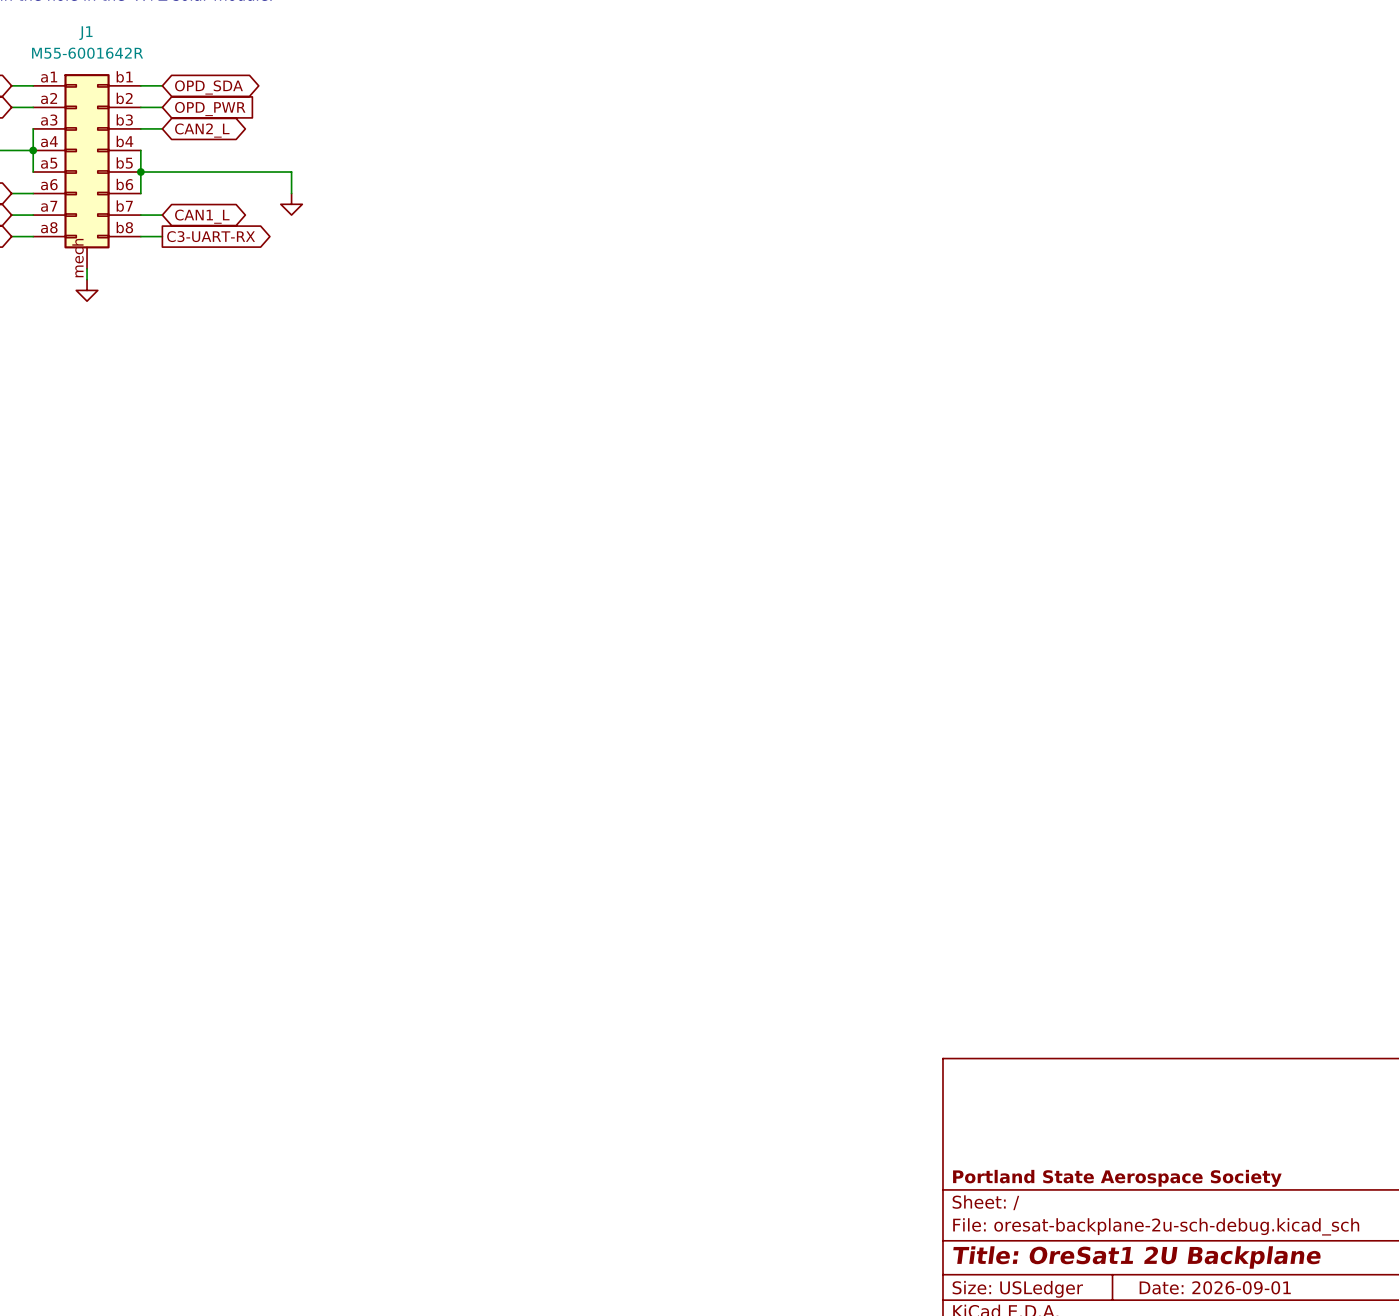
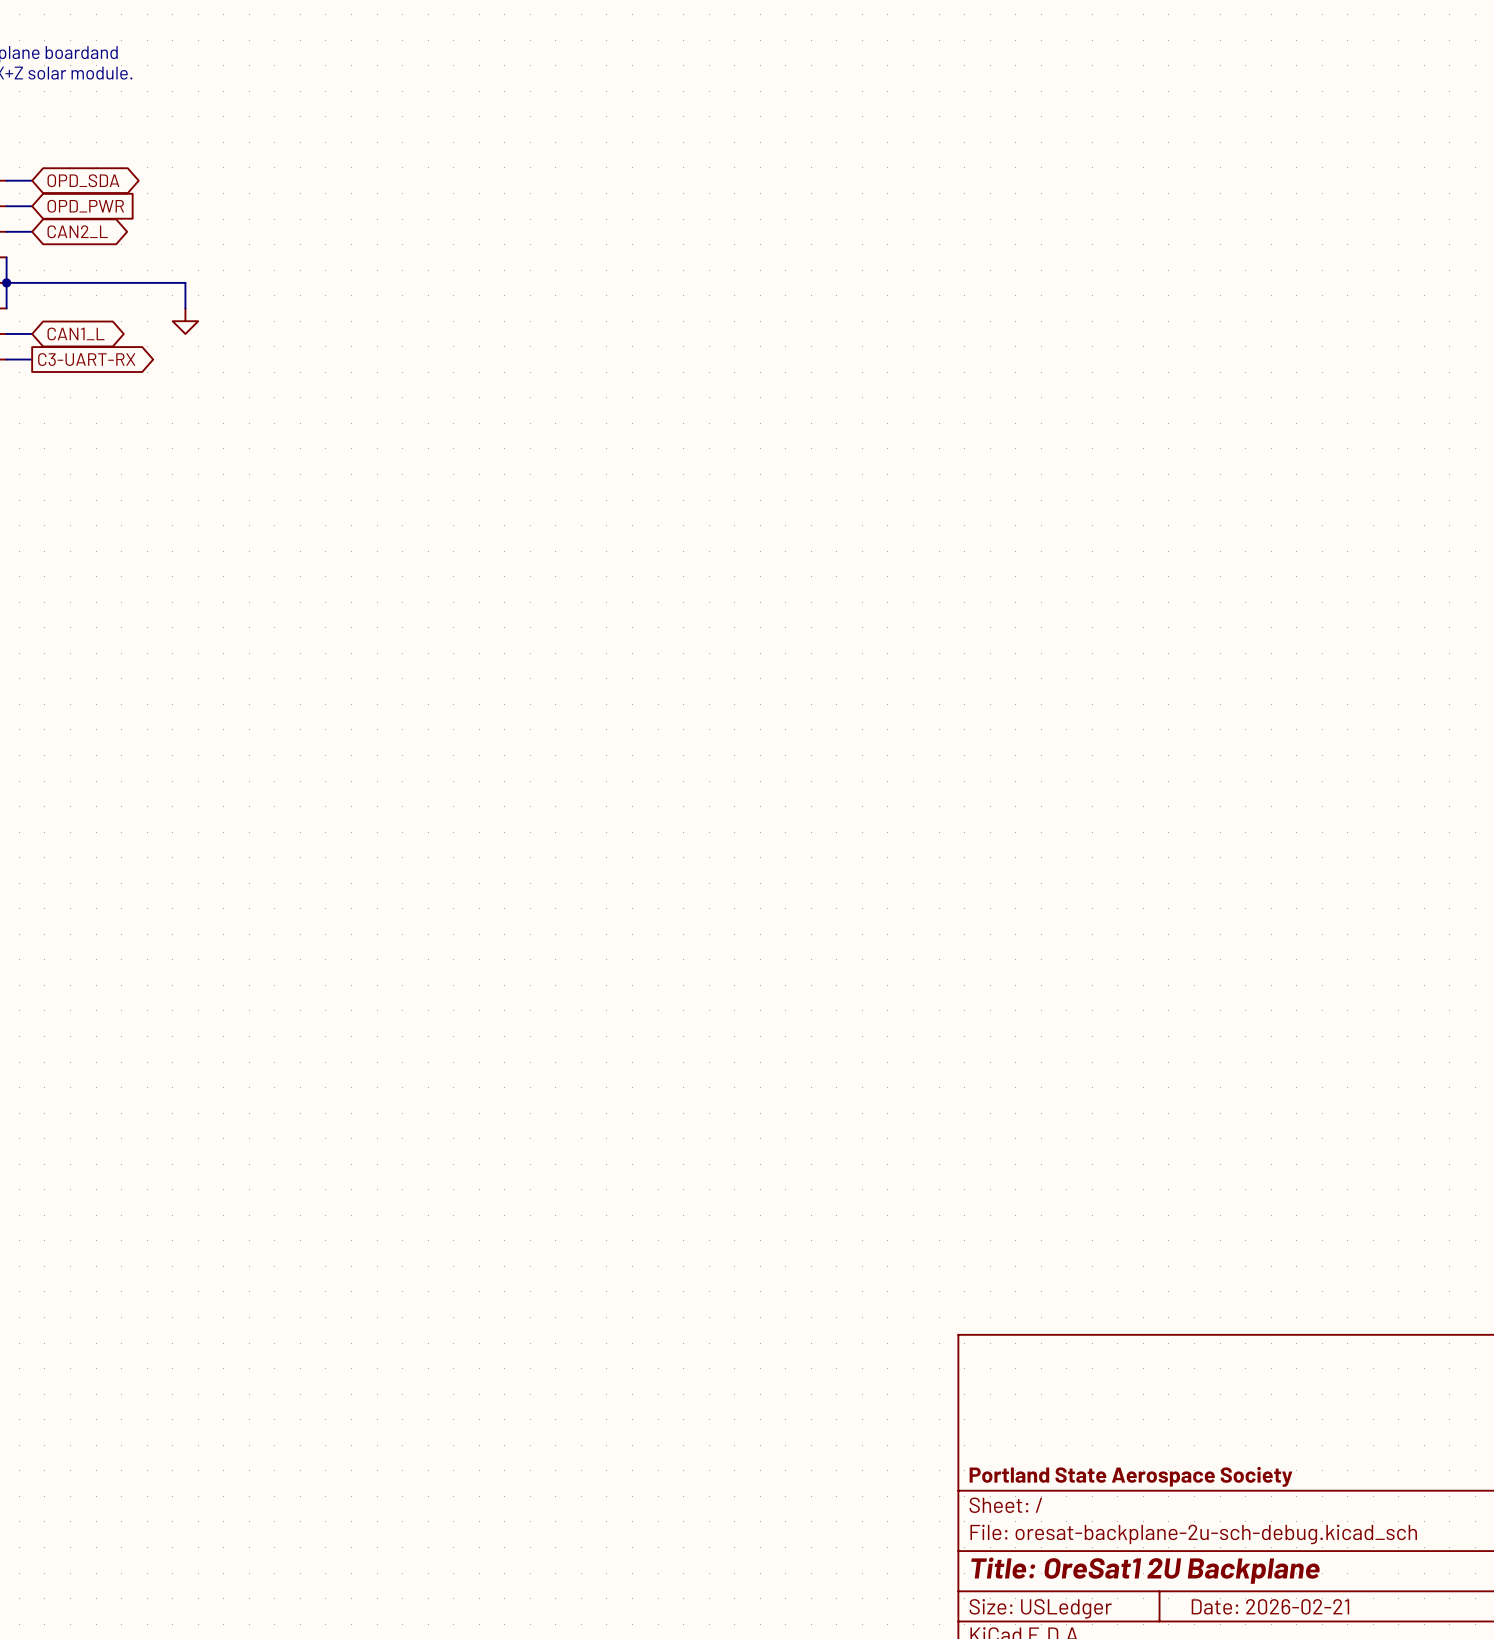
title block: Date: 2026-09-01 (1215, 1287) -> Date: 2026-02-21 (1270, 1606)

